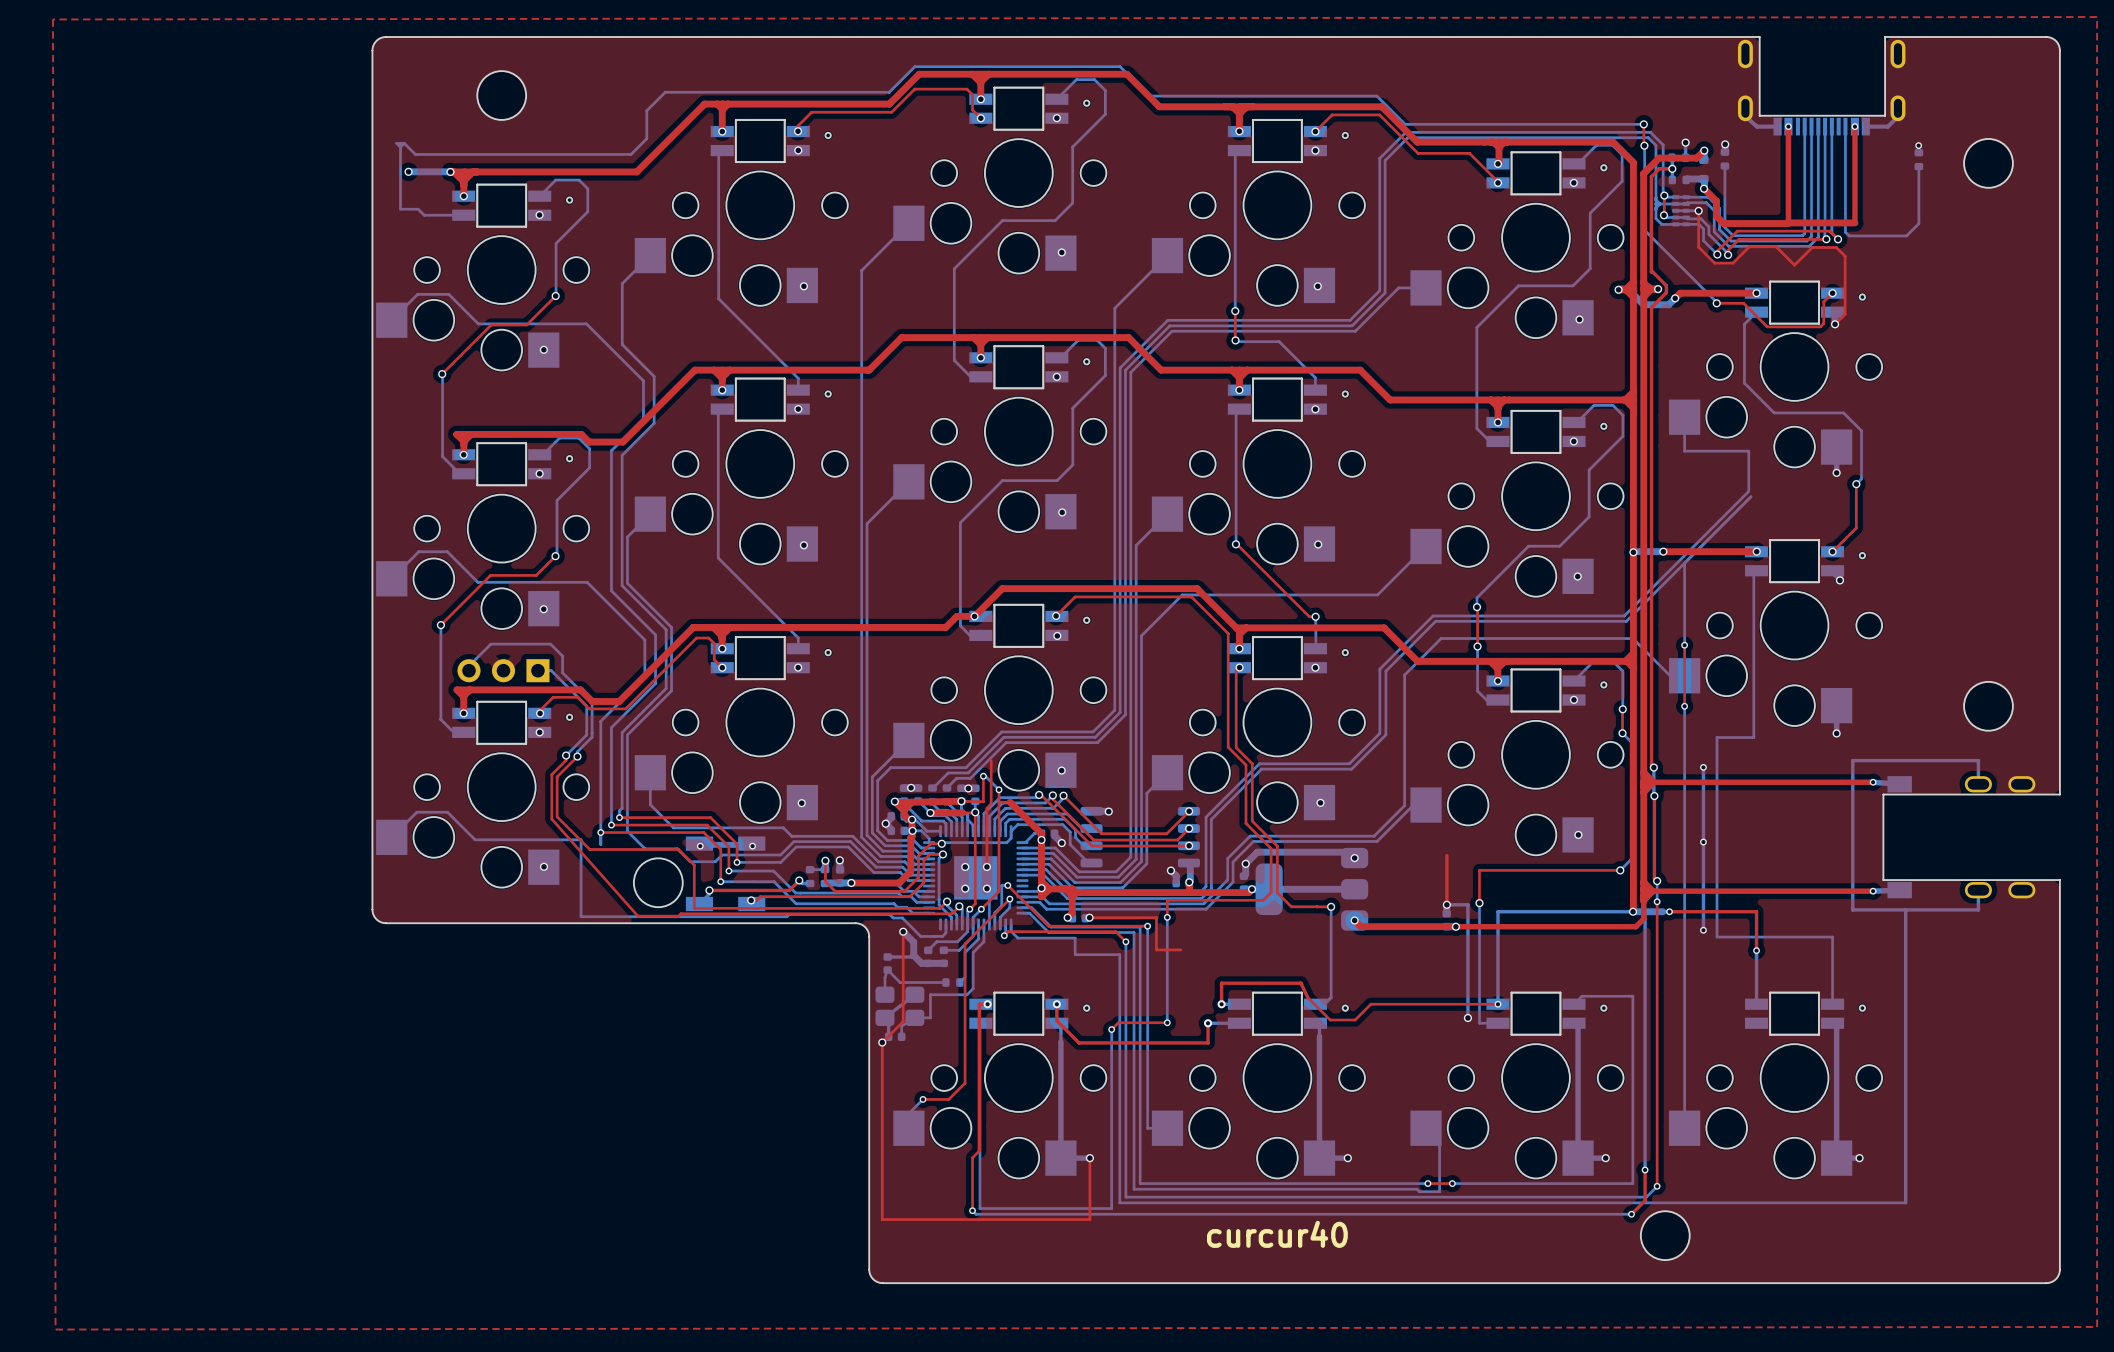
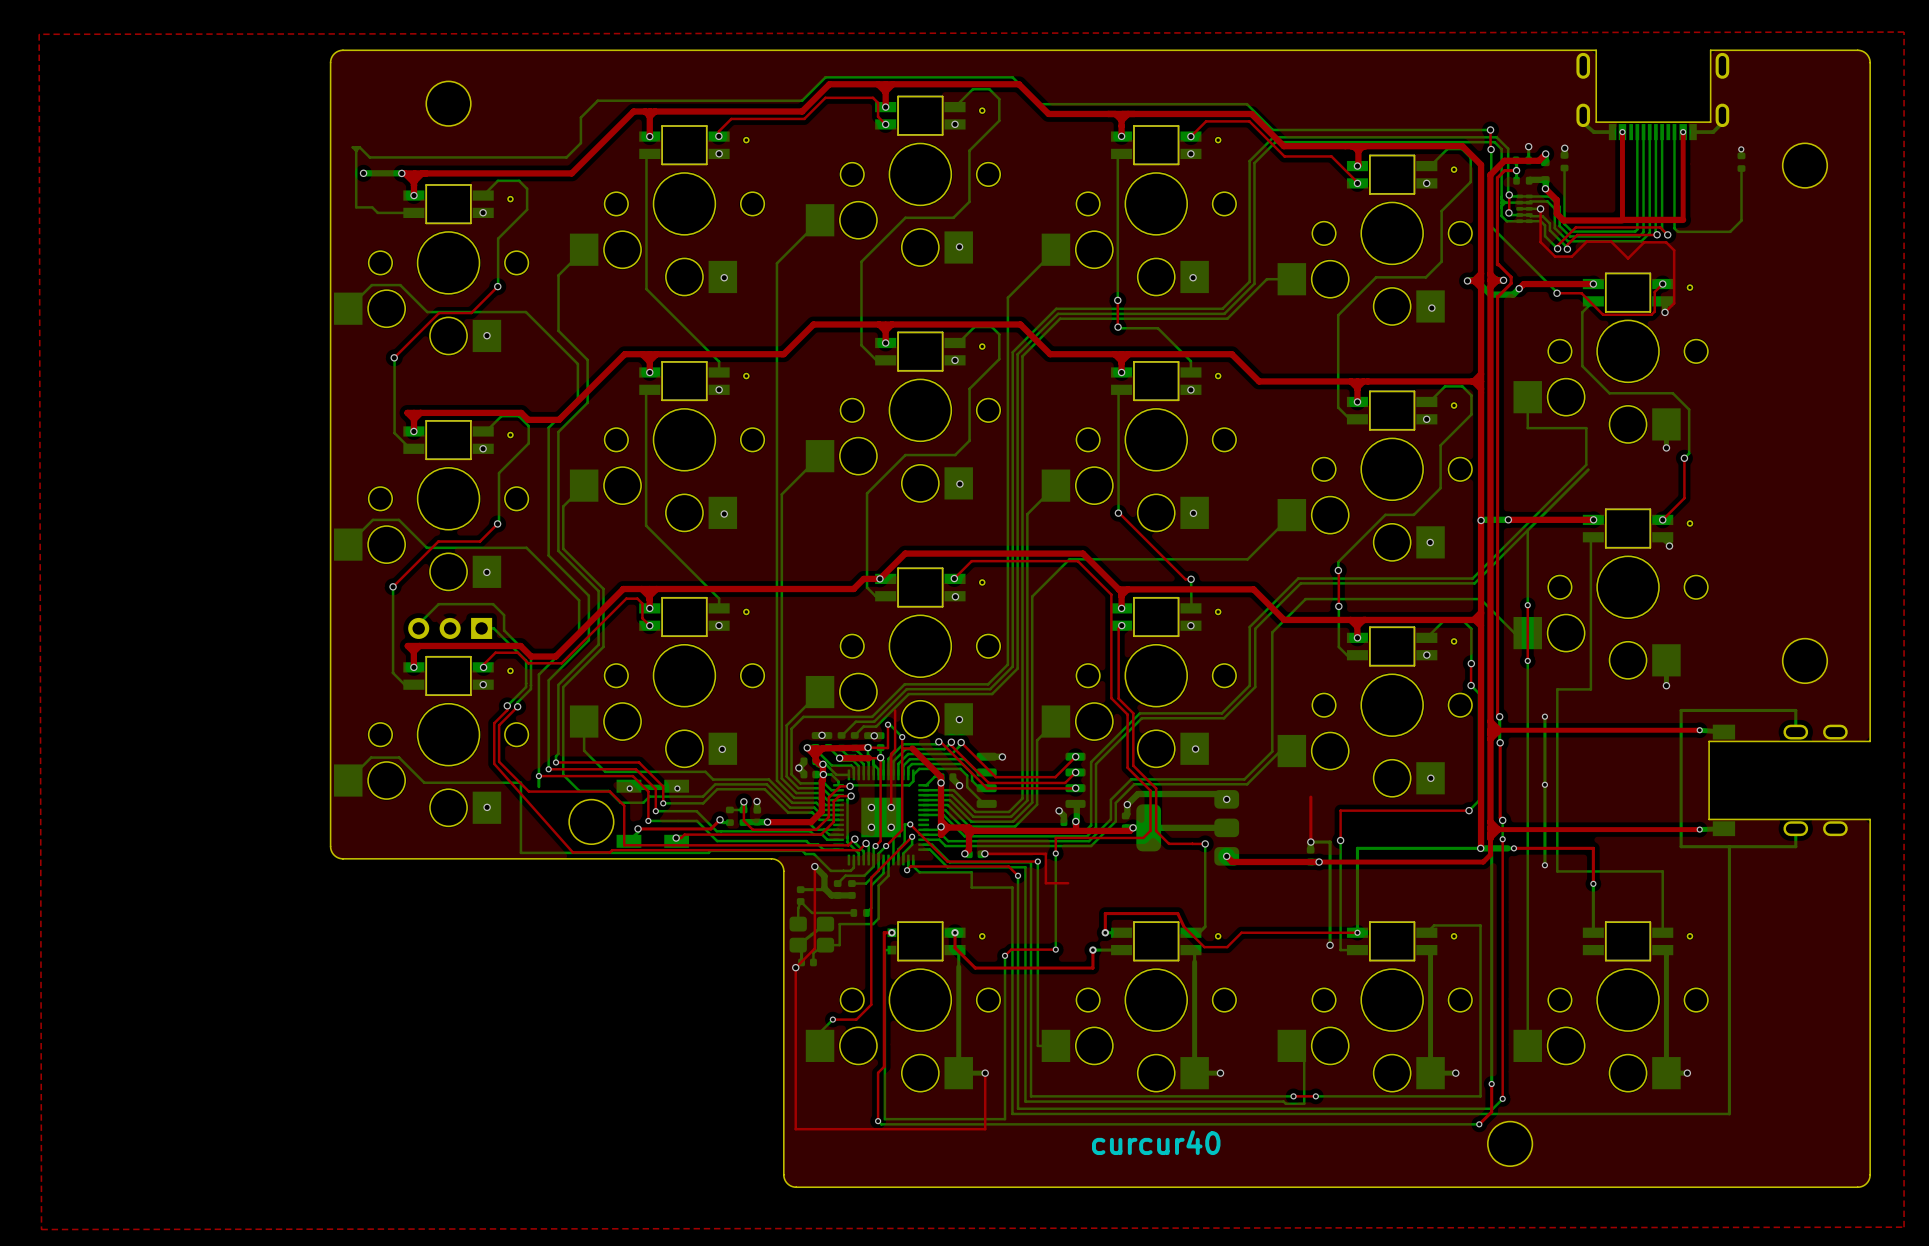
part footprint: [969, 992, 1069, 1036] -> [887, 921, 966, 962]

